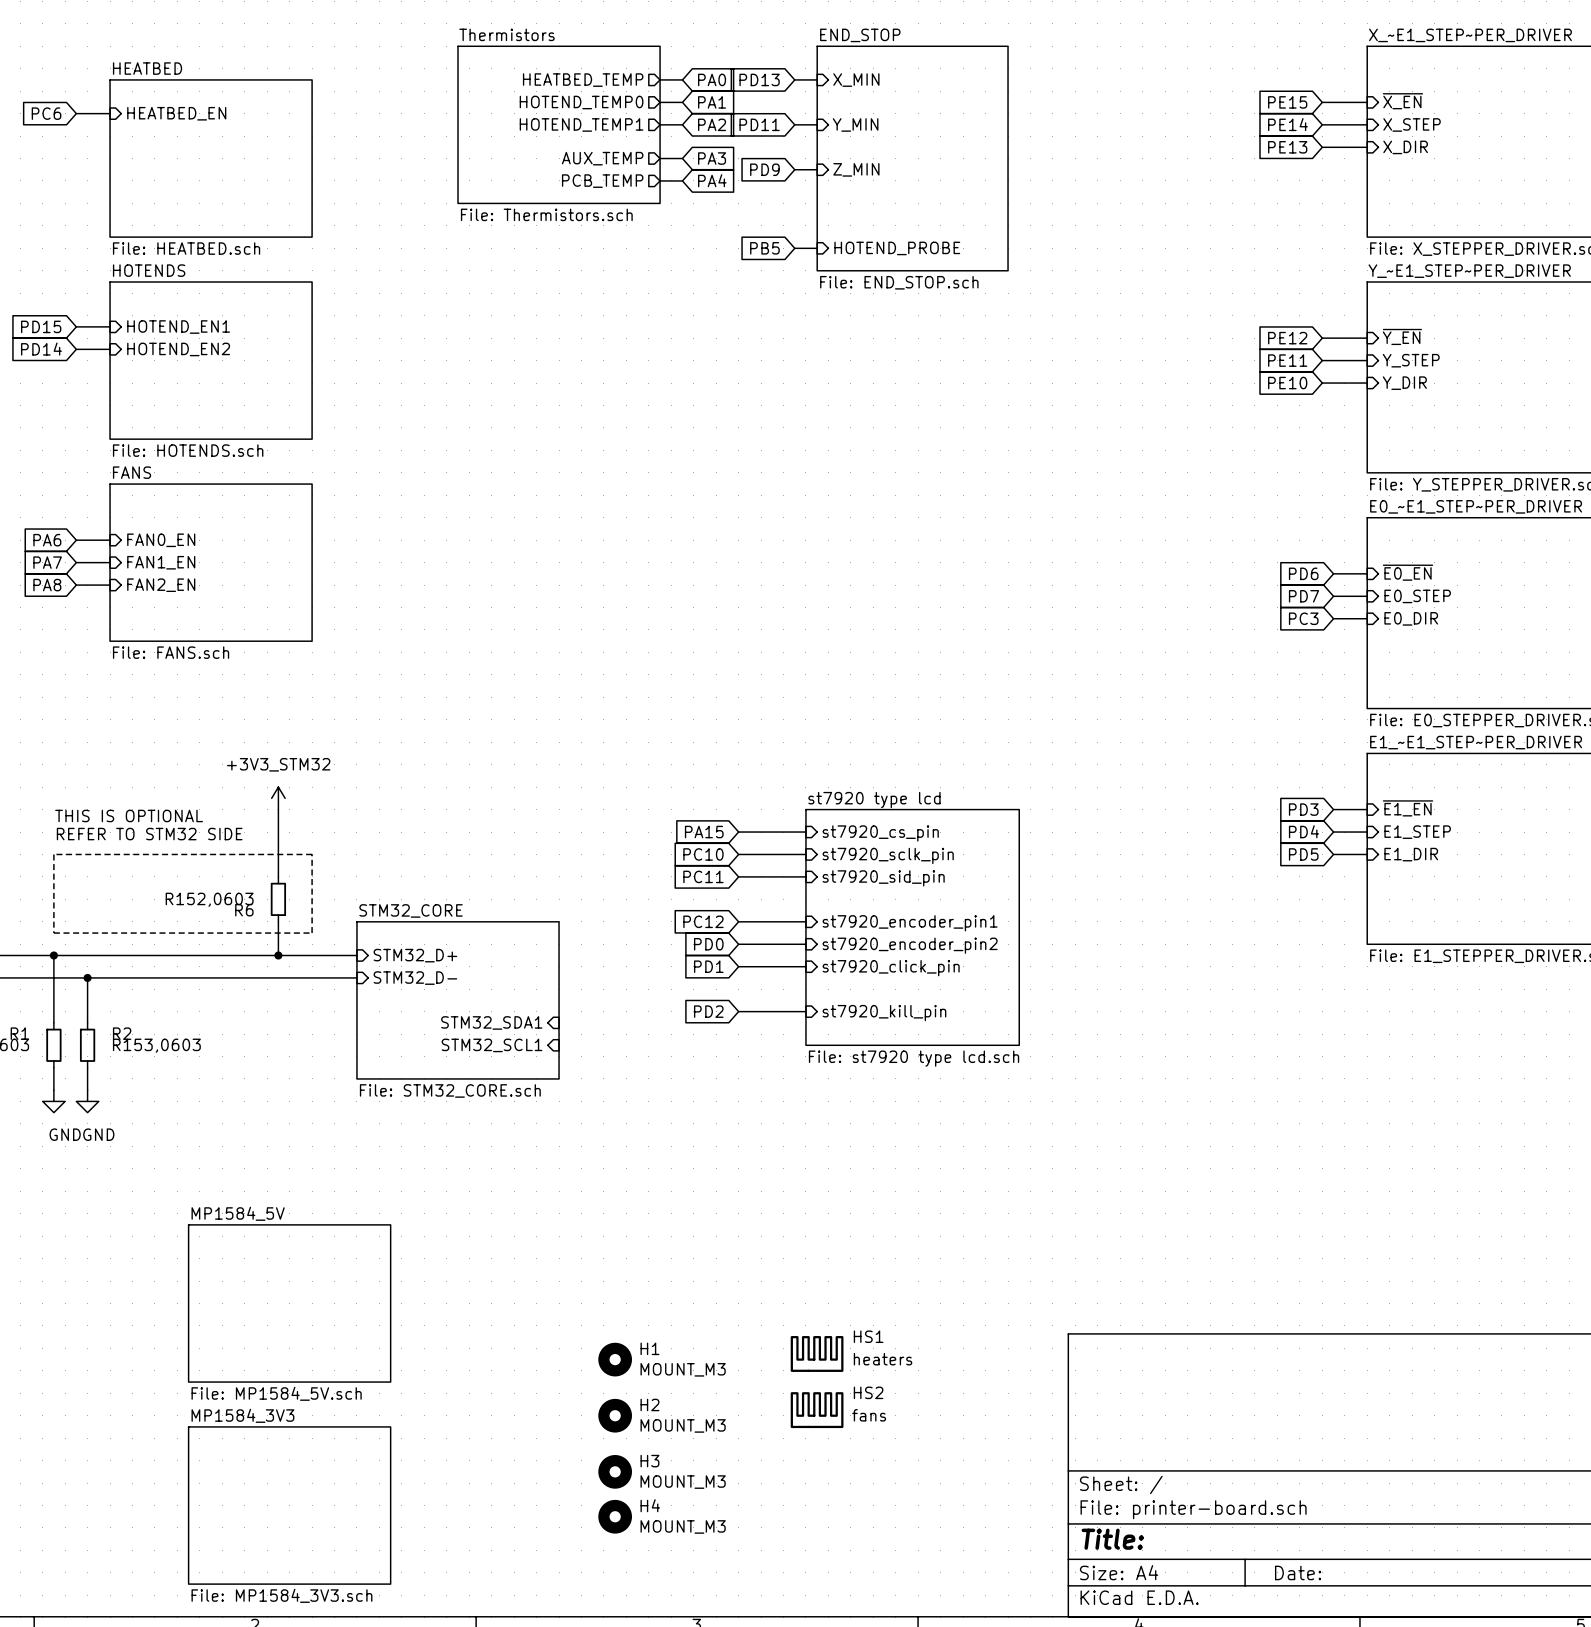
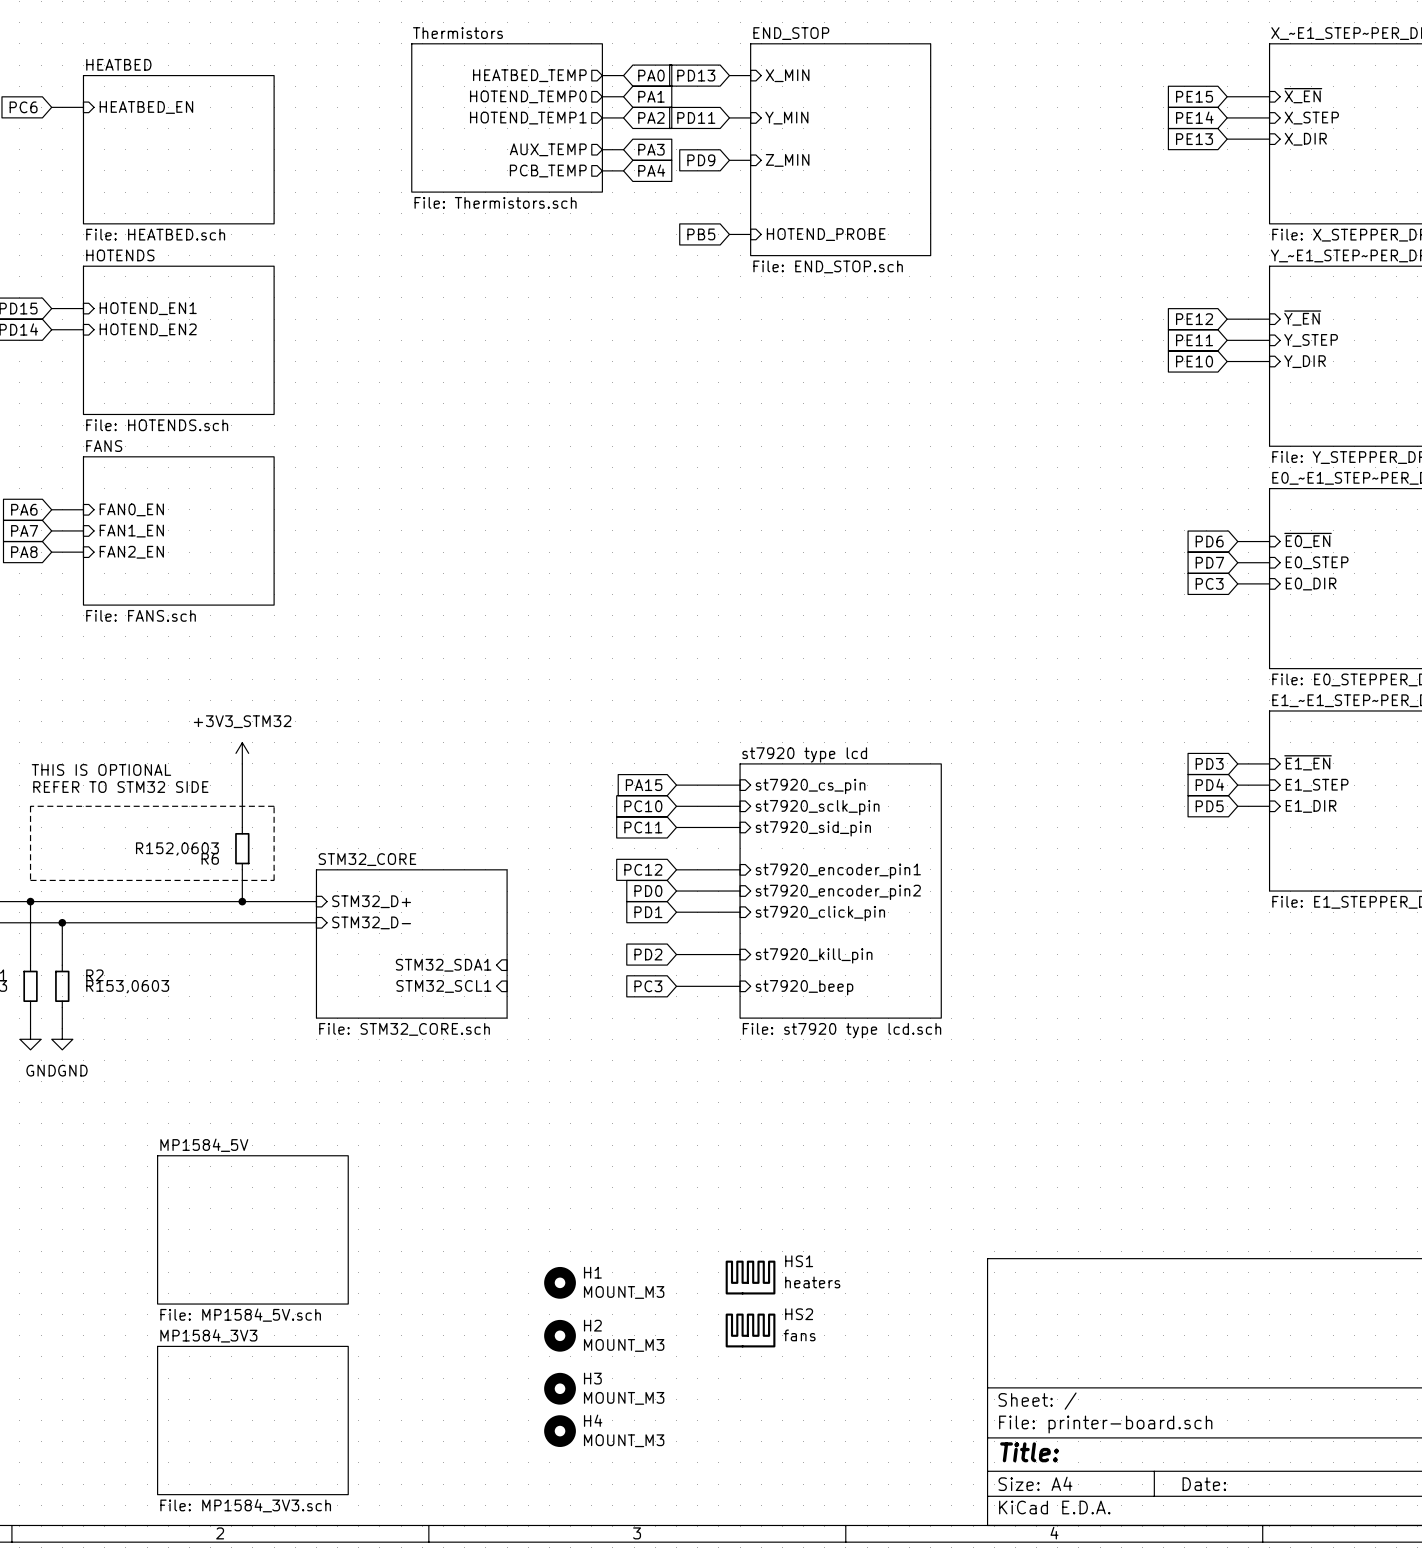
sheet st7920 type lcd shape: [805, 809, 1020, 1046] -> [740, 763, 942, 1019]
global label: none -> PC3 (648, 986)
wire: none -> (676, 986) (740, 986)
sheet pin: none -> st7920_beep (804, 987)

